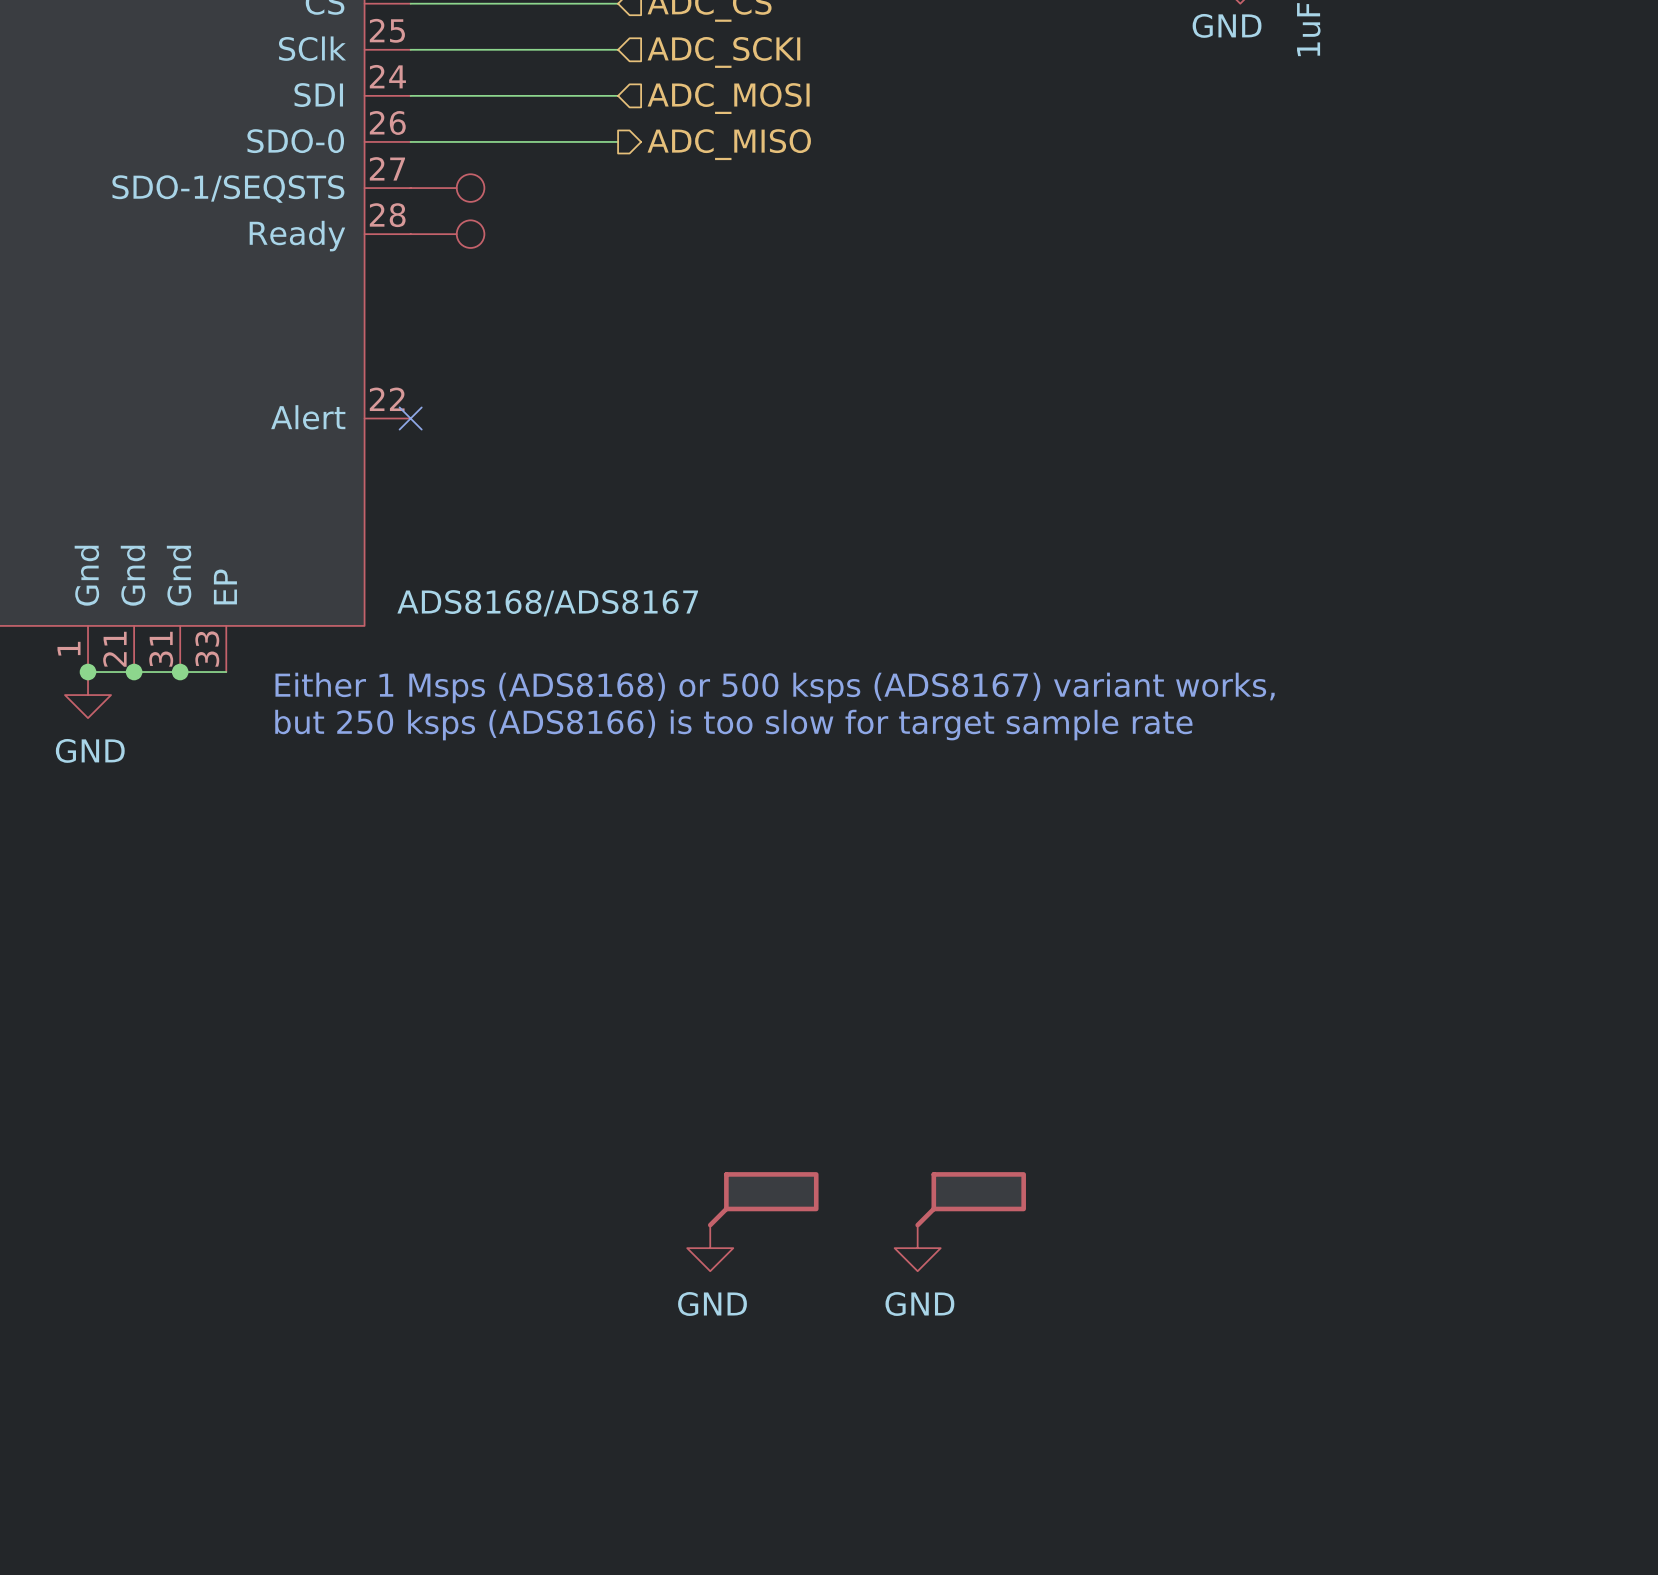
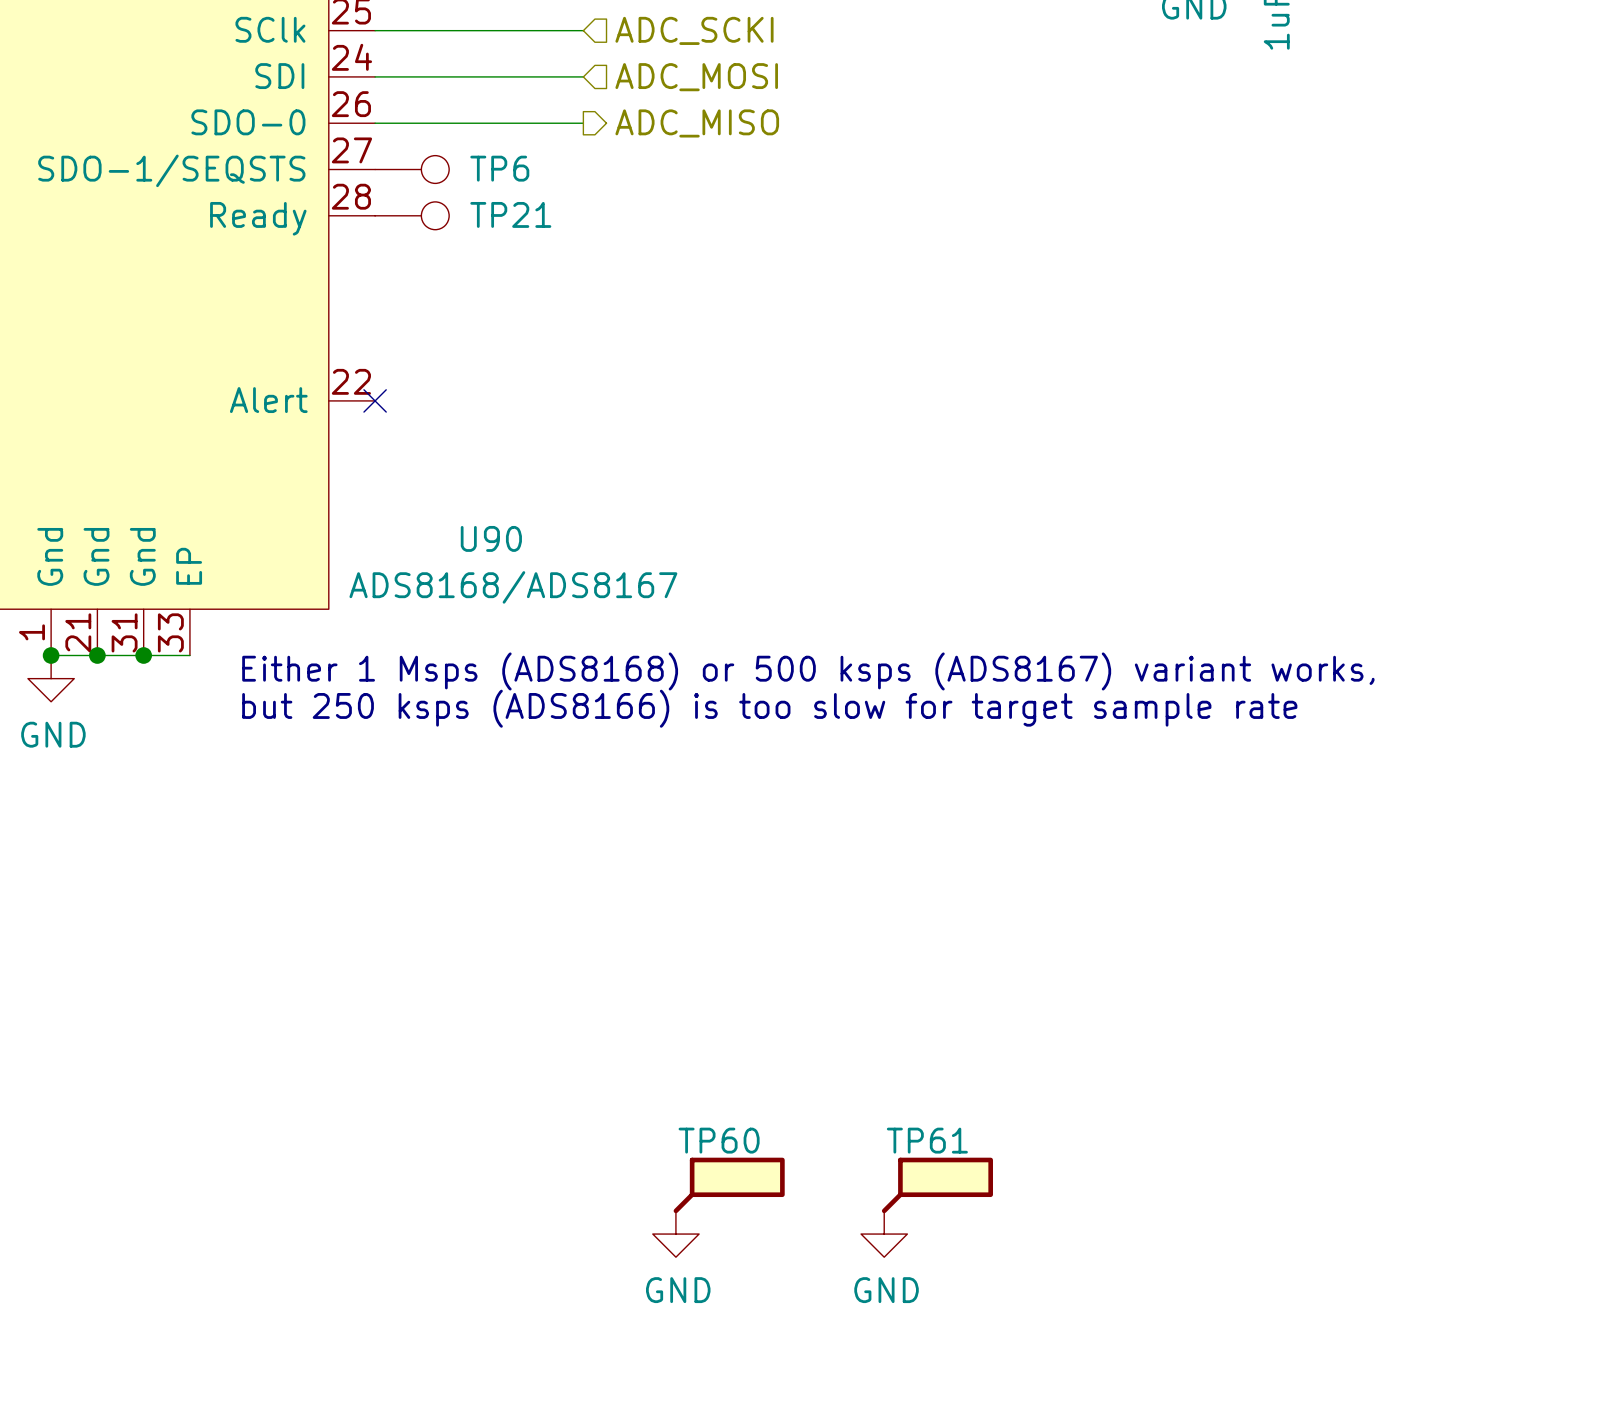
TP6 name: none -> TP6 (499, 168)
TP21 name: none -> TP21 (510, 214)
U90 name: none -> U90 (491, 538)
TP60 name: none -> TP60 (719, 1140)
TP61 name: none -> TP61 (927, 1140)

